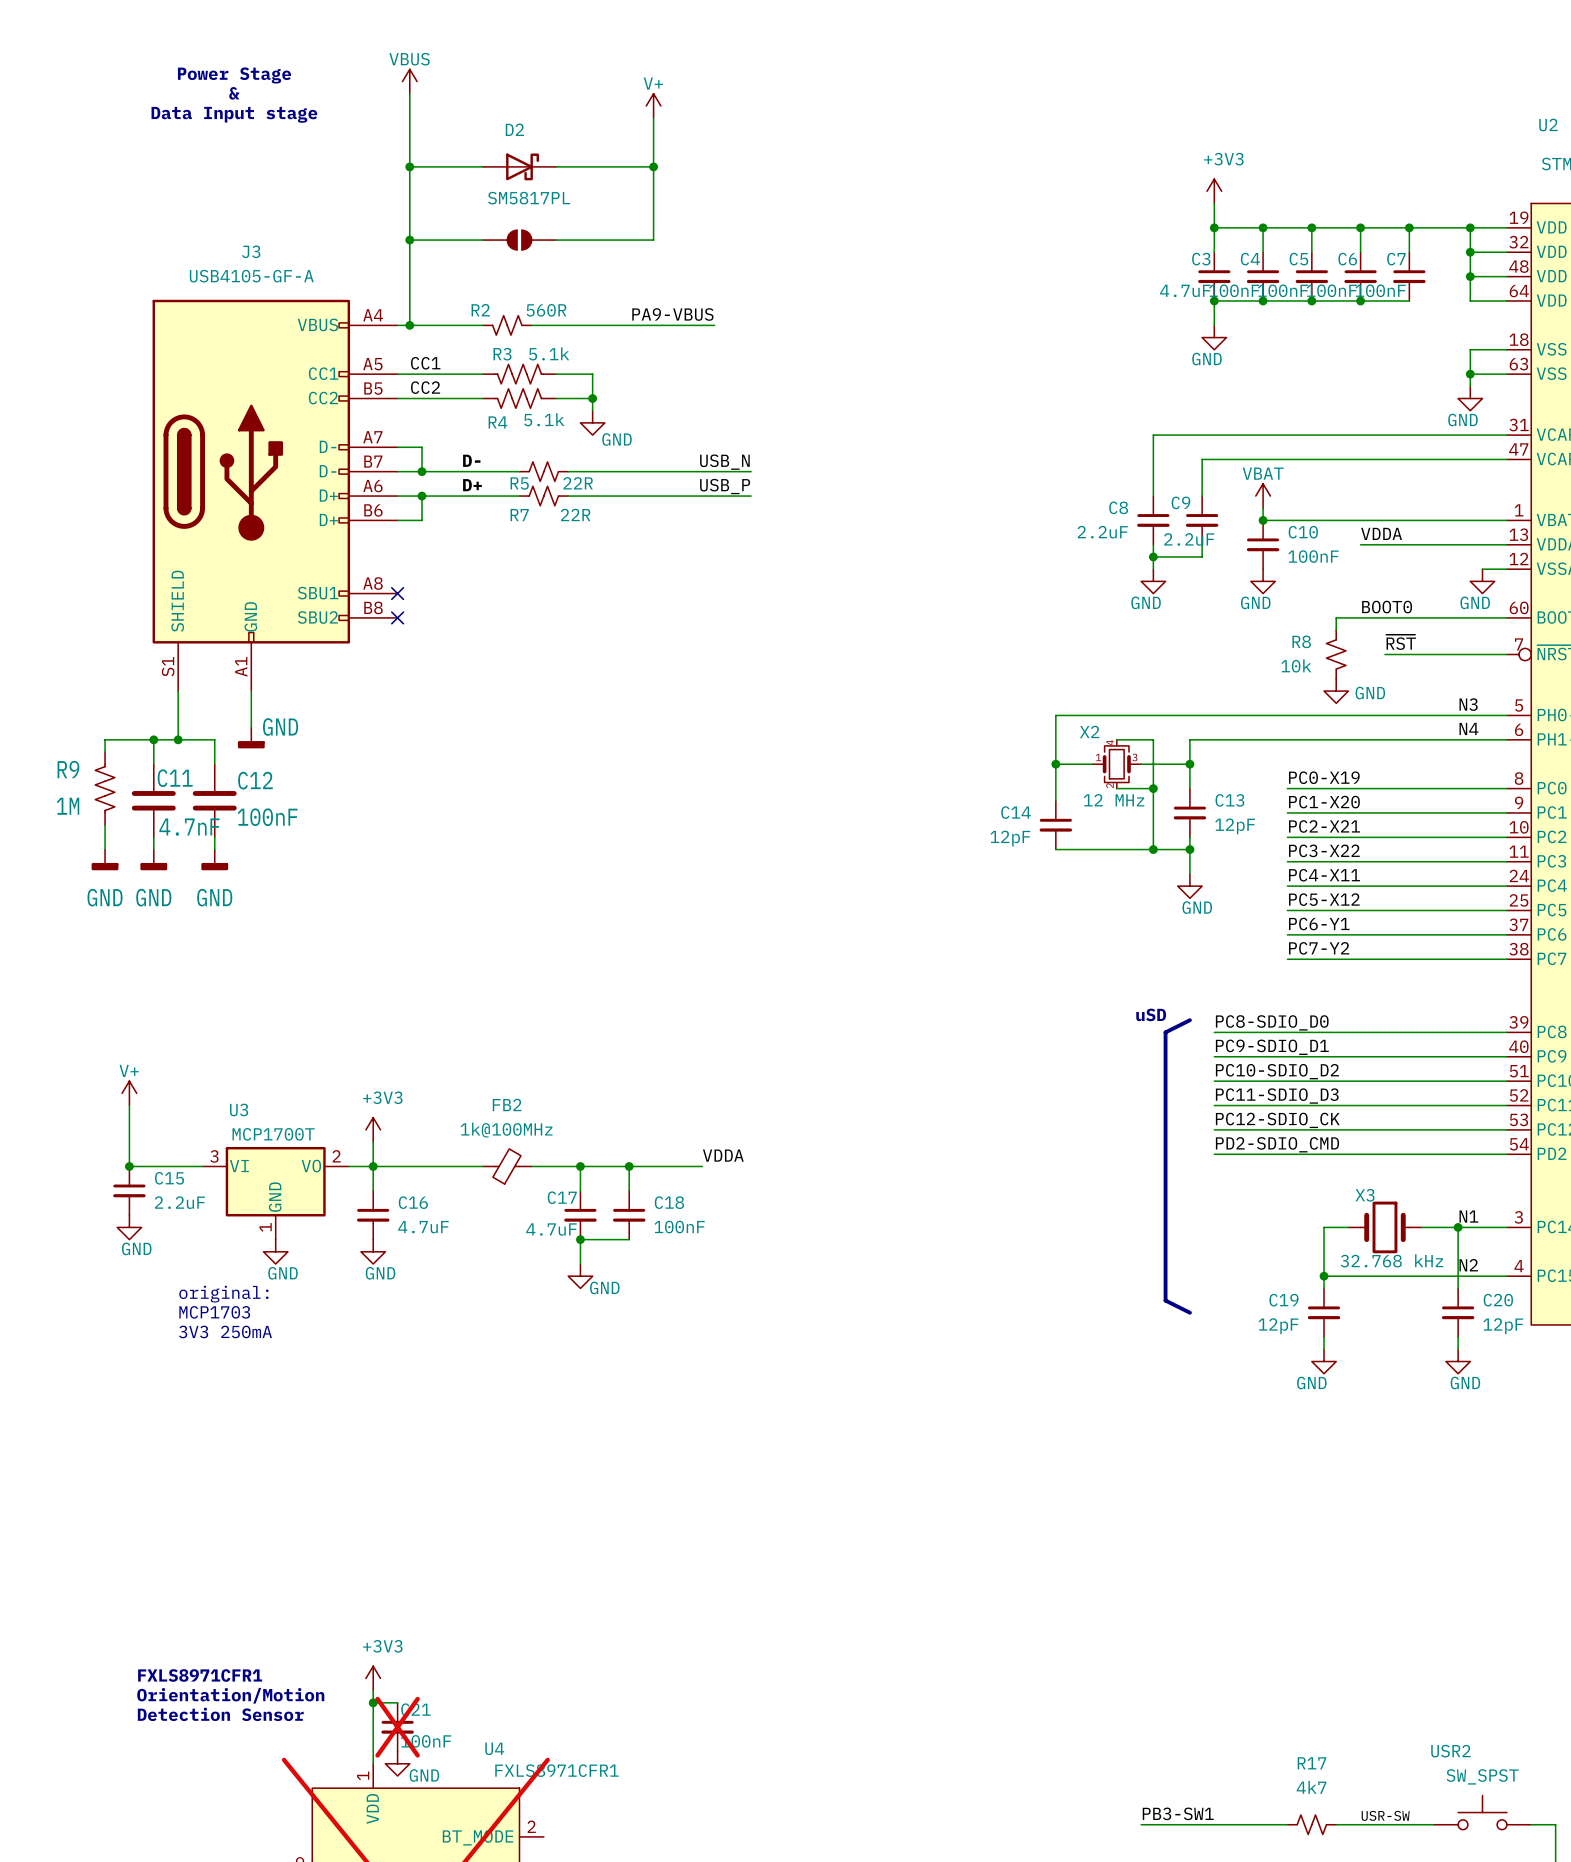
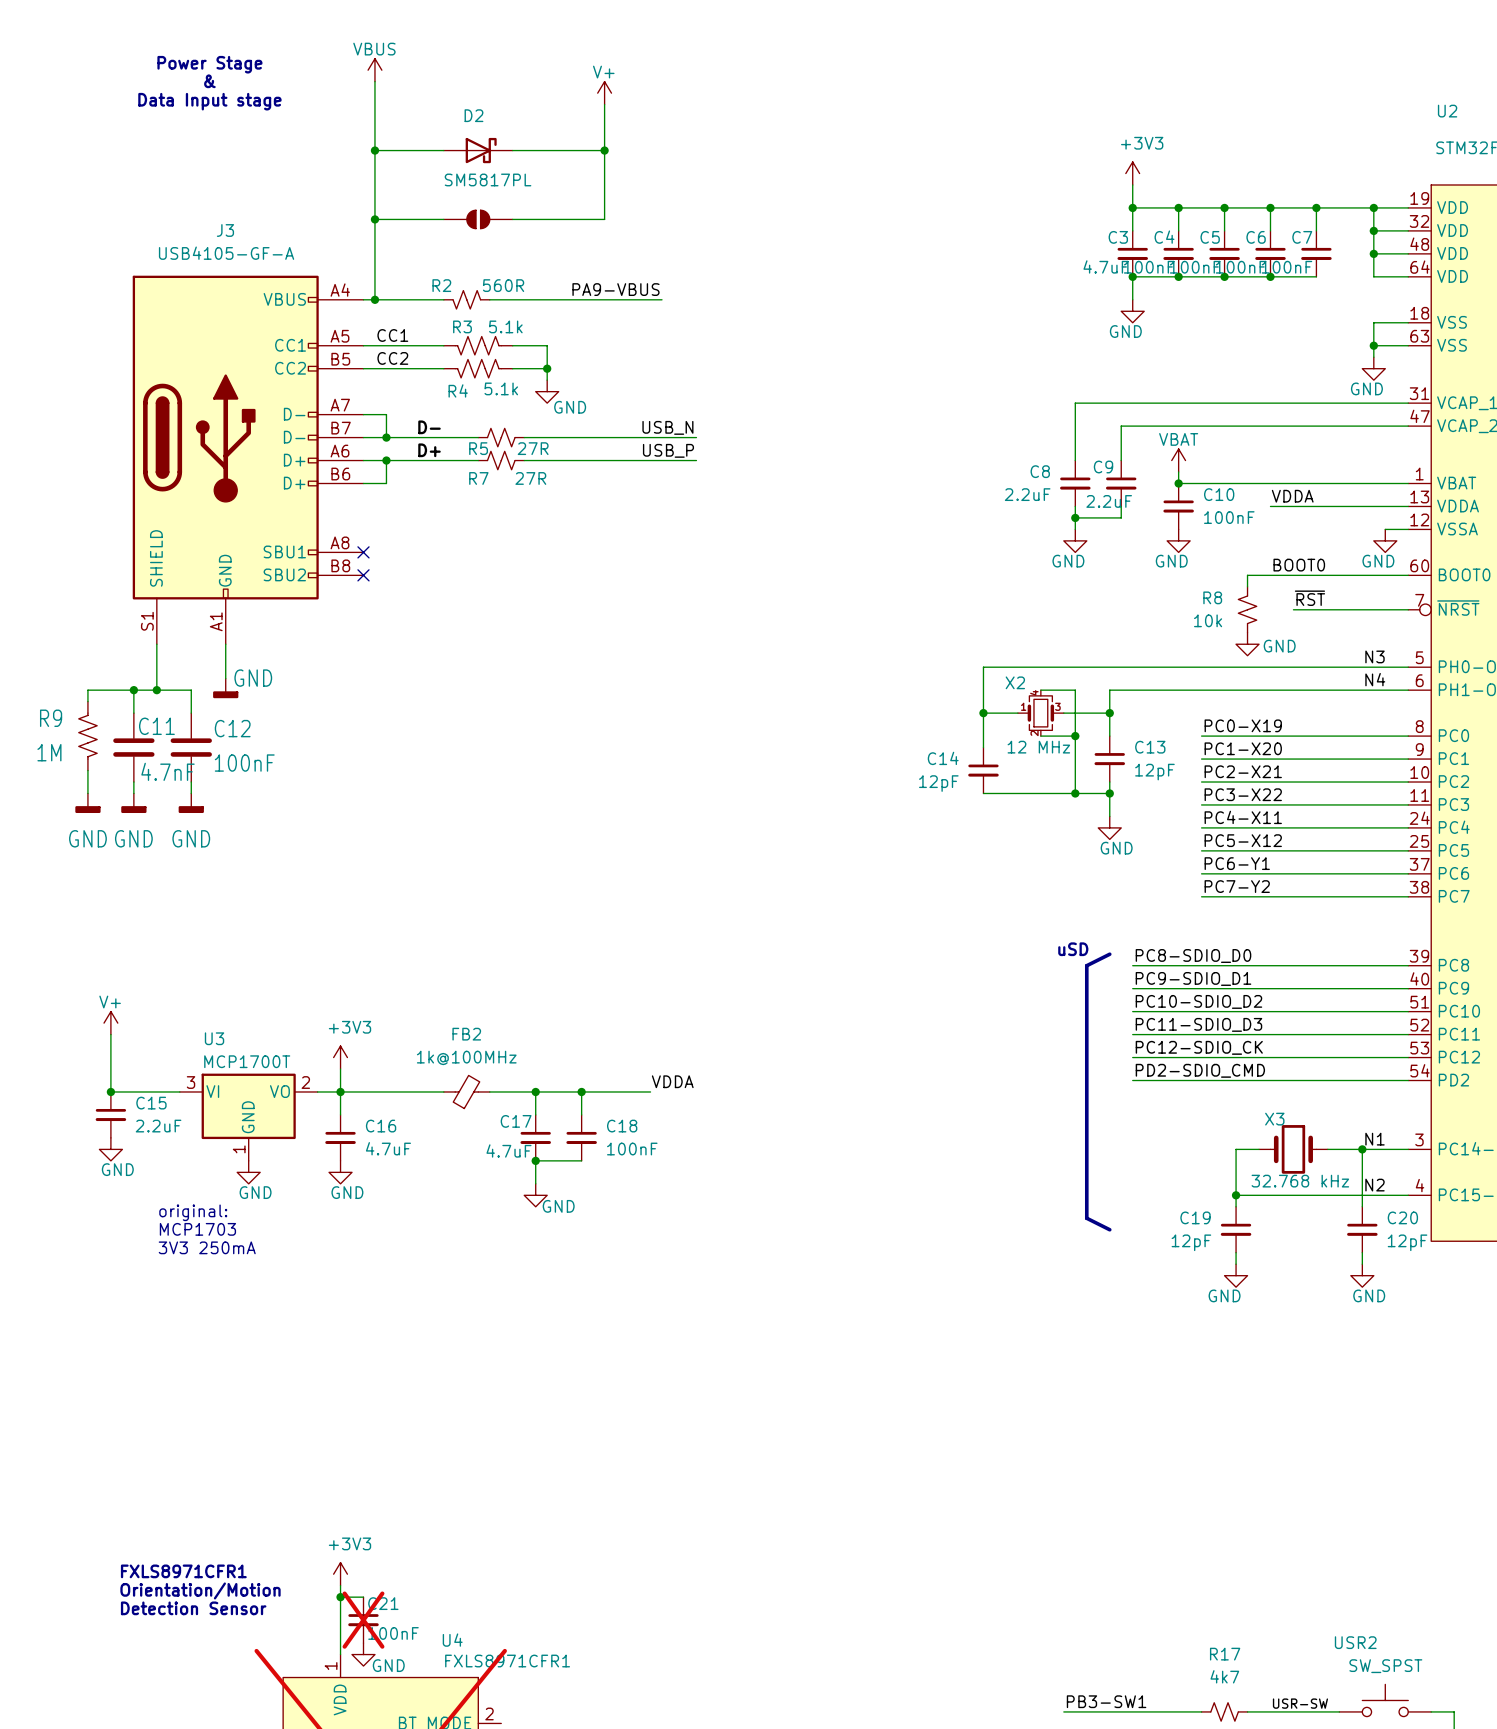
R5 value: 22R (578, 483) -> 27R (533, 448)
R7 value: 22R (575, 514) -> 27R (530, 478)

